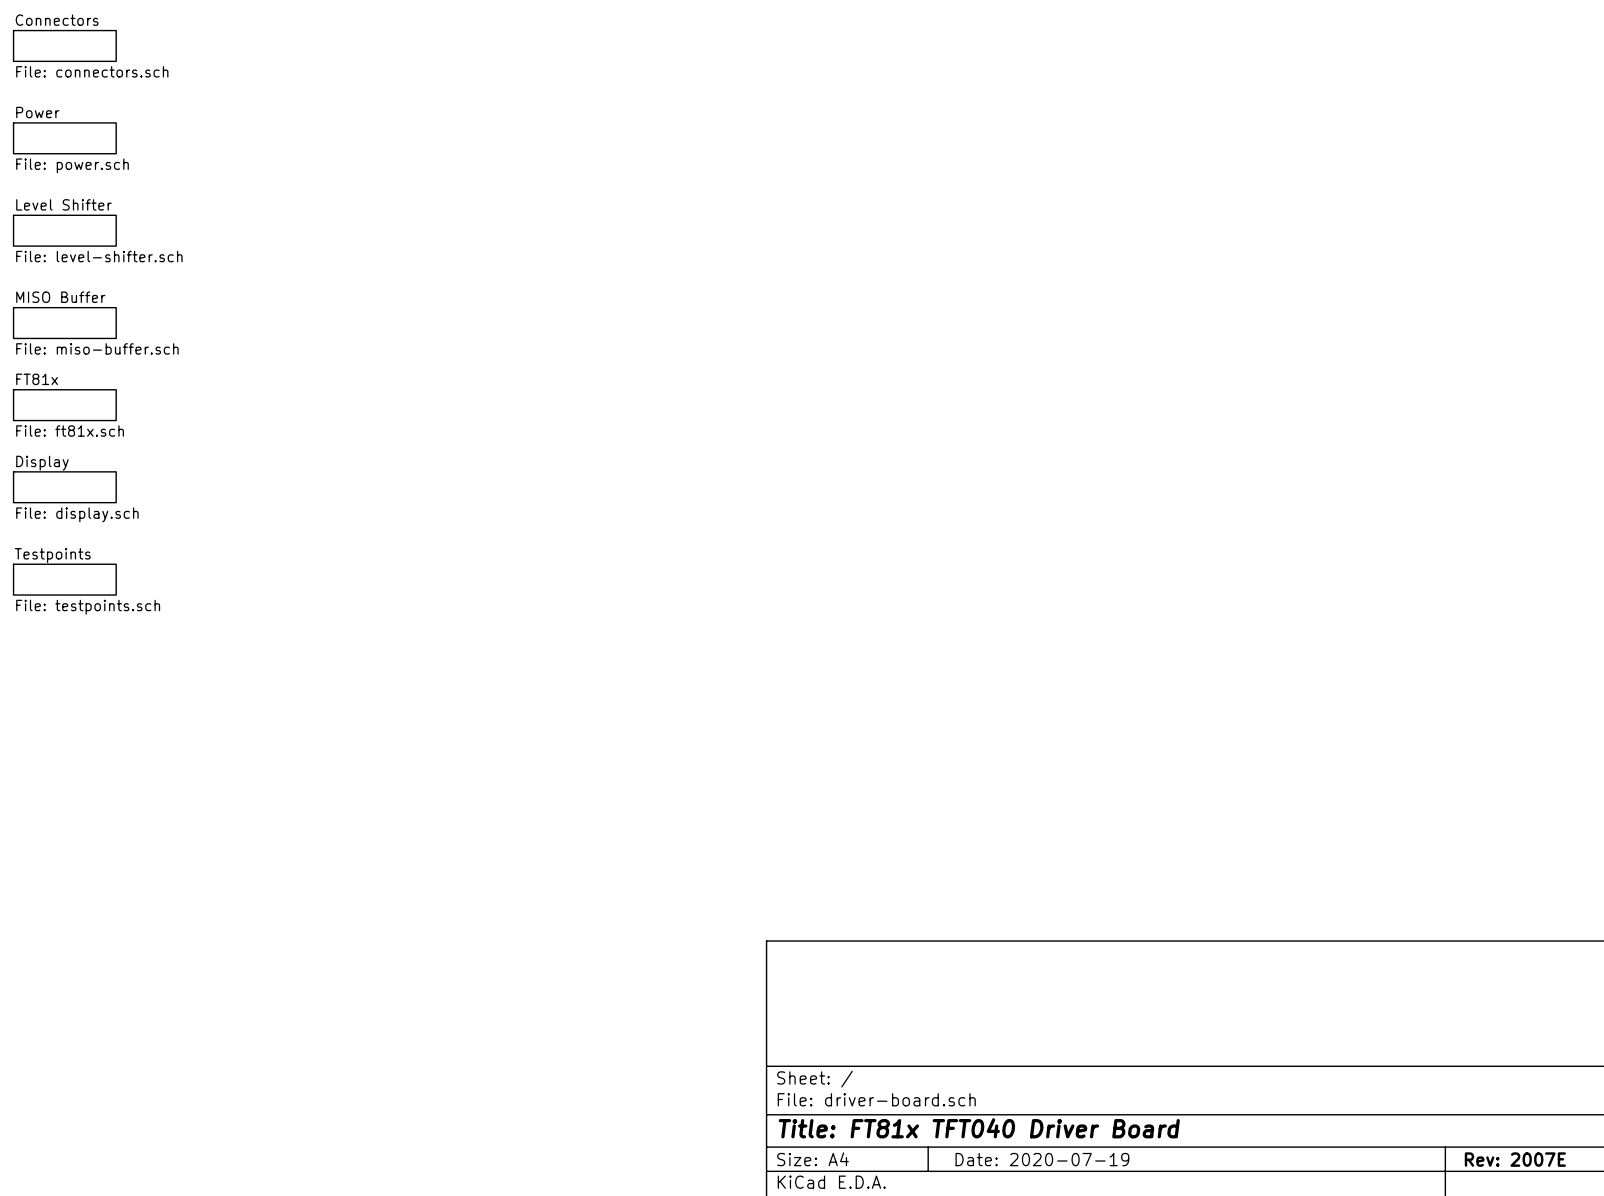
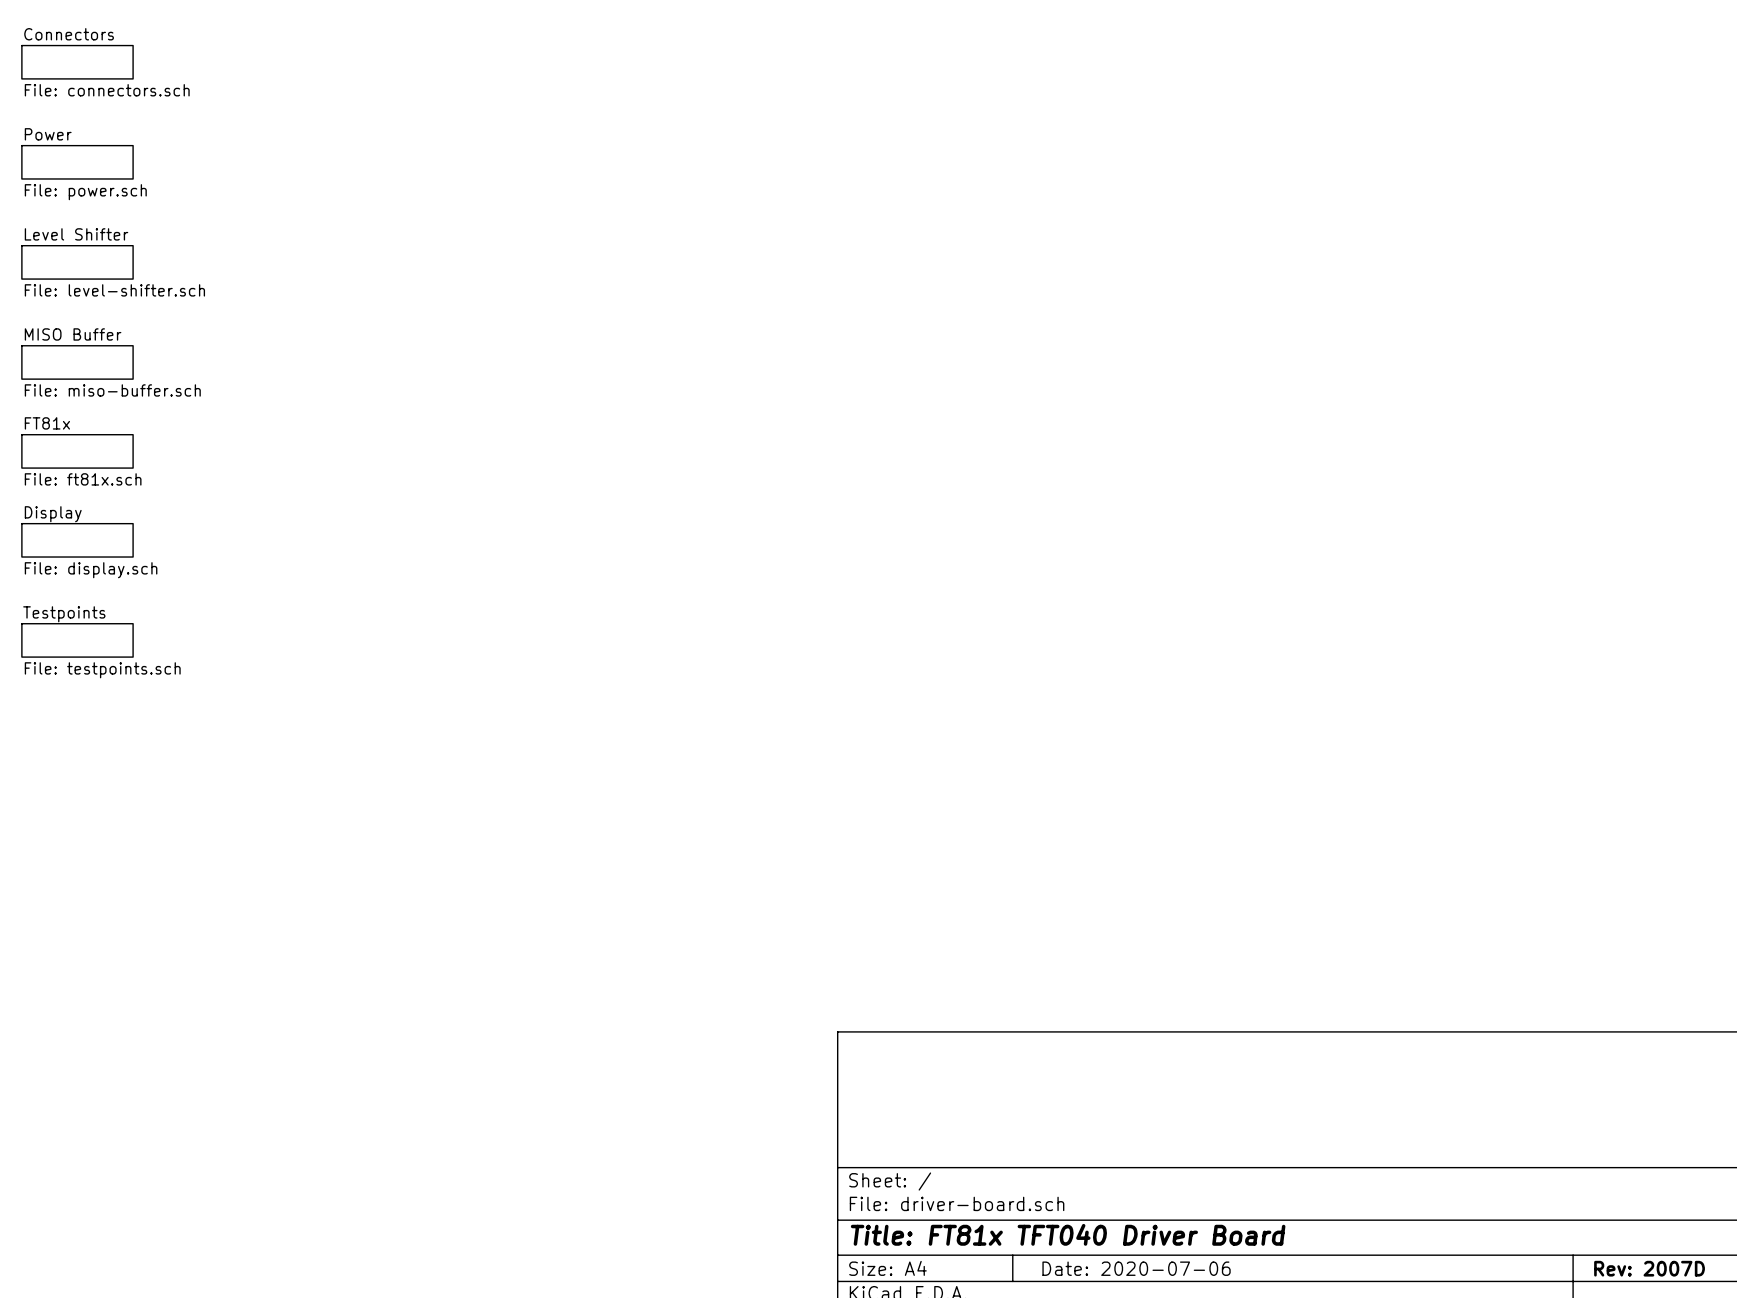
title block: Date: 2020-07-19 (1042, 1159) -> Date: 2020-07-06 (1136, 1268)
title block: Rev: 2007E (1515, 1159) -> Rev: 2007D (1649, 1268)

